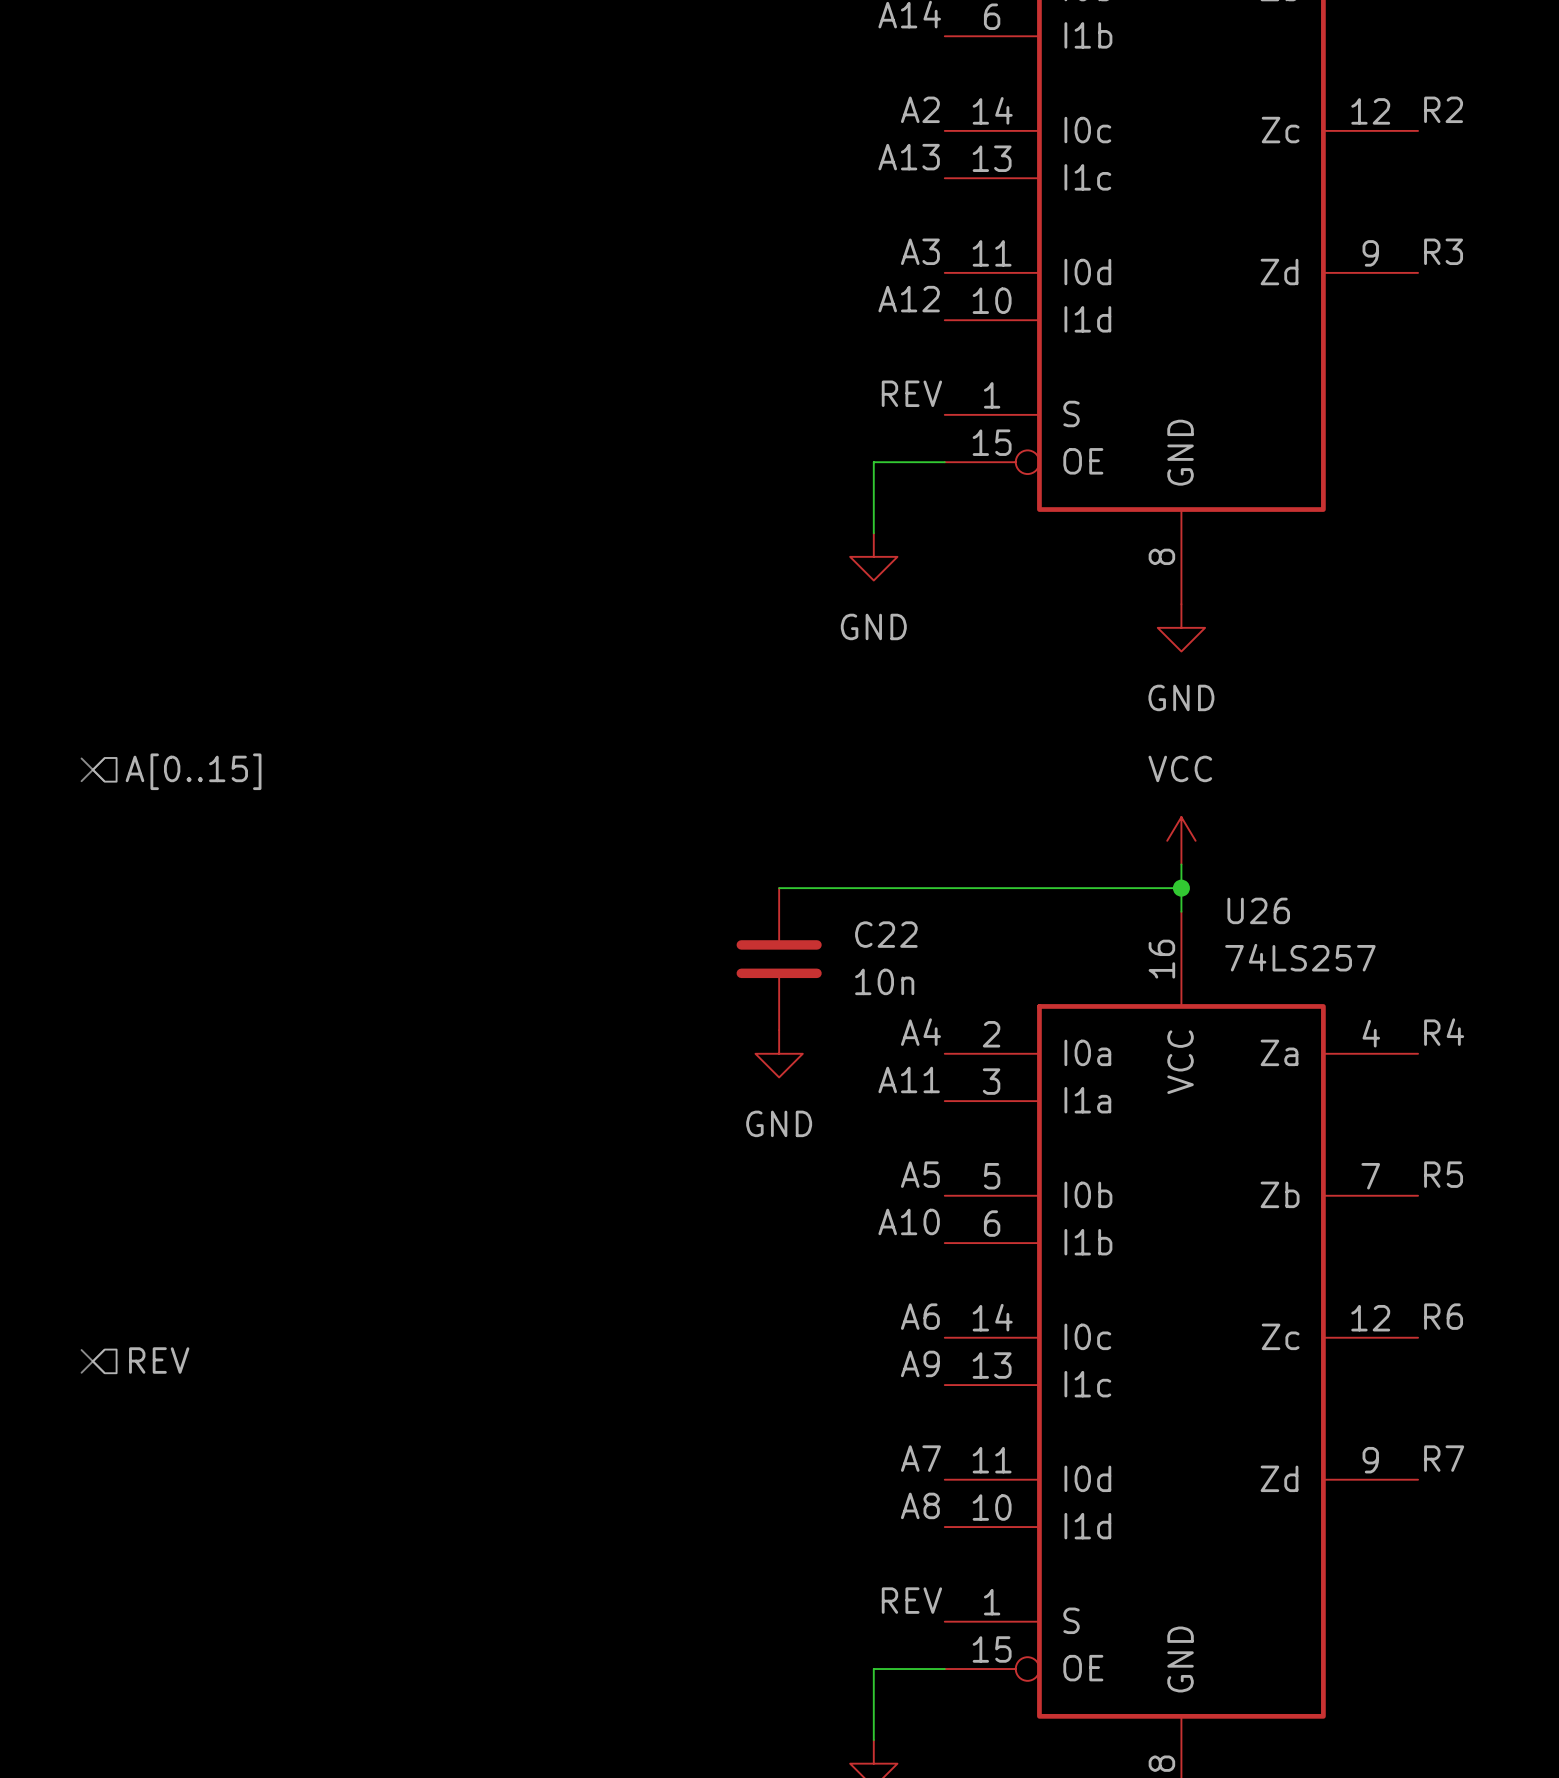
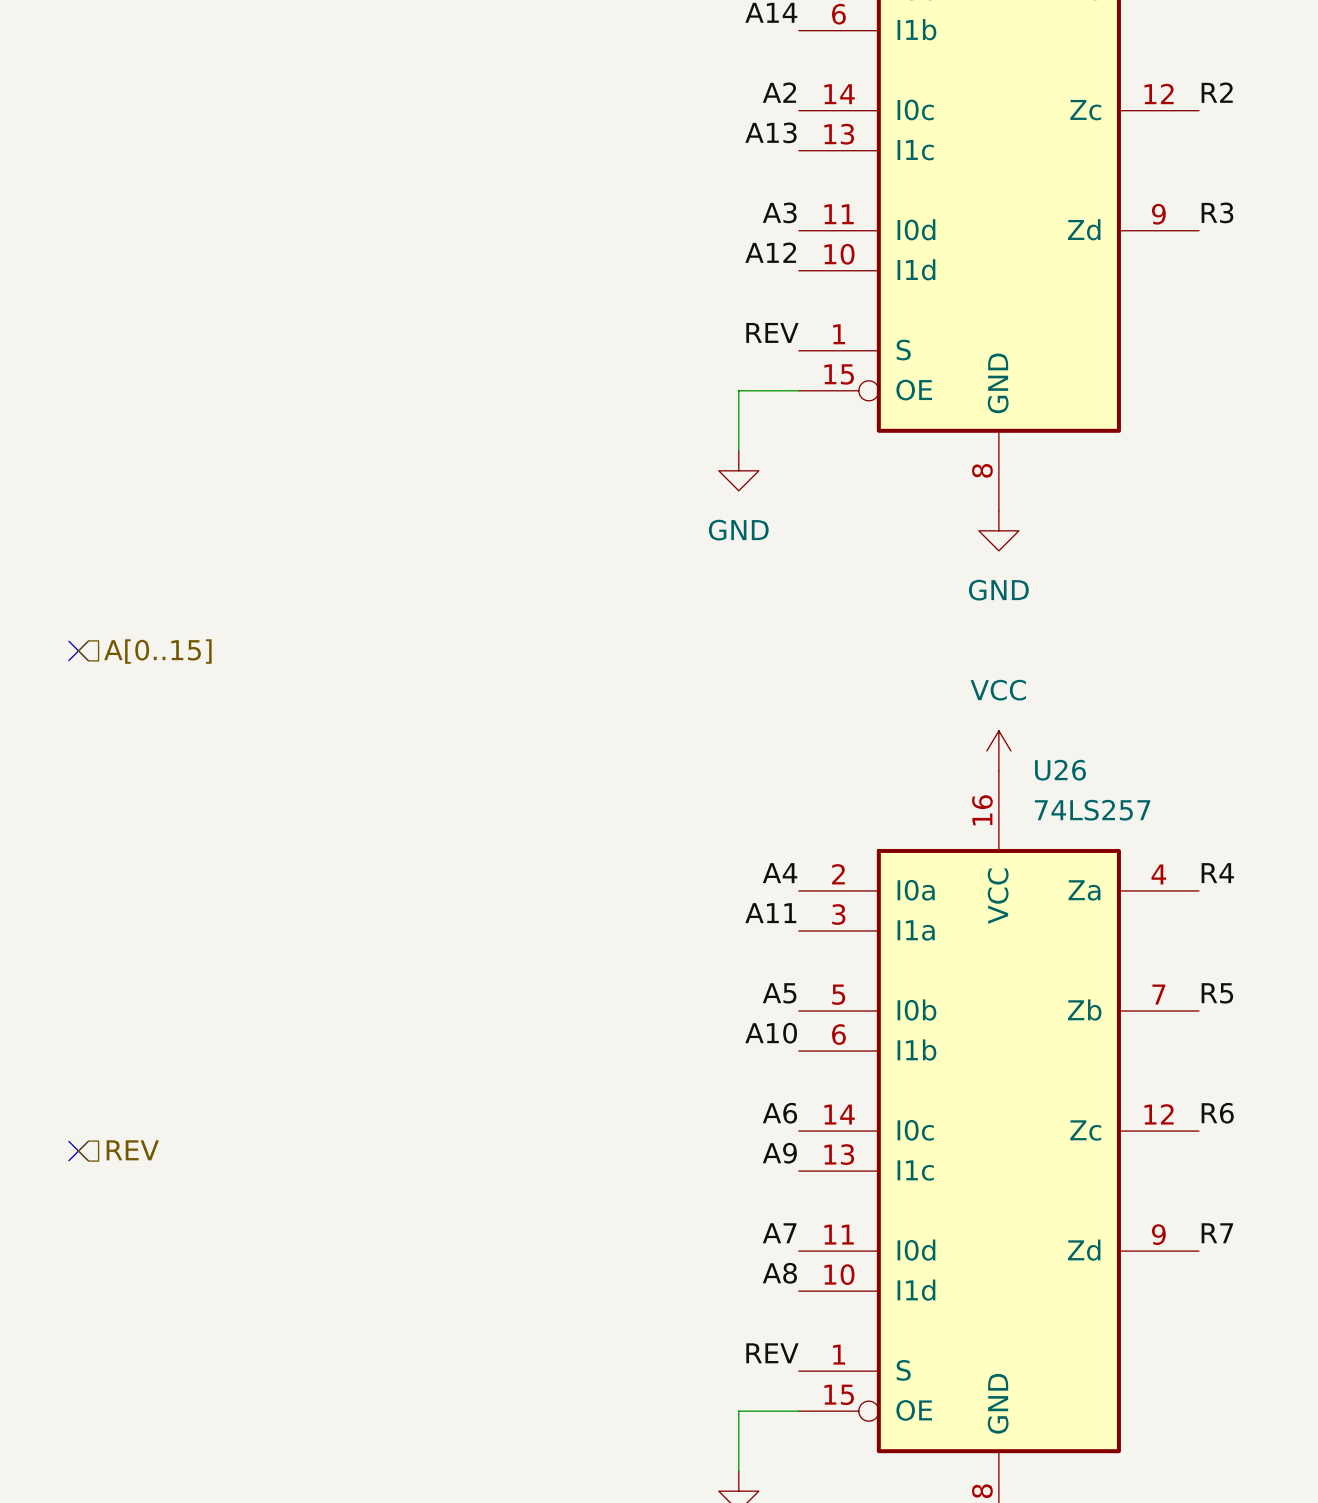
power symbol position: VCC (1181, 840) -> VCC (998, 750)
wire: (779, 888) (1181, 888) -> none
junction: (1181, 888) -> none
C22: 10n (779, 959) -> none
power symbol: GND (779, 1053) -> none

